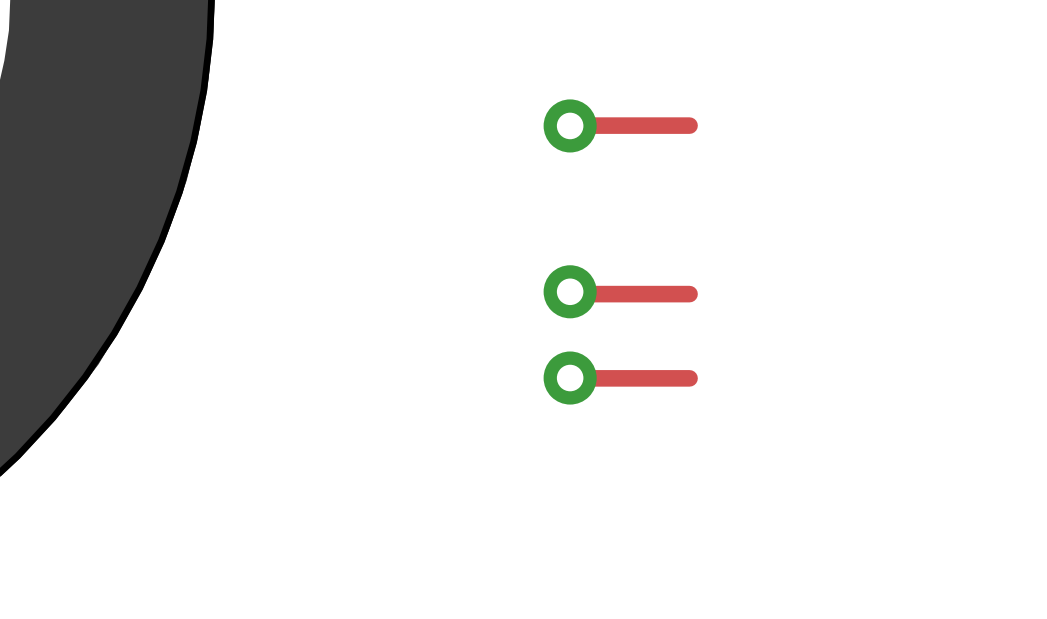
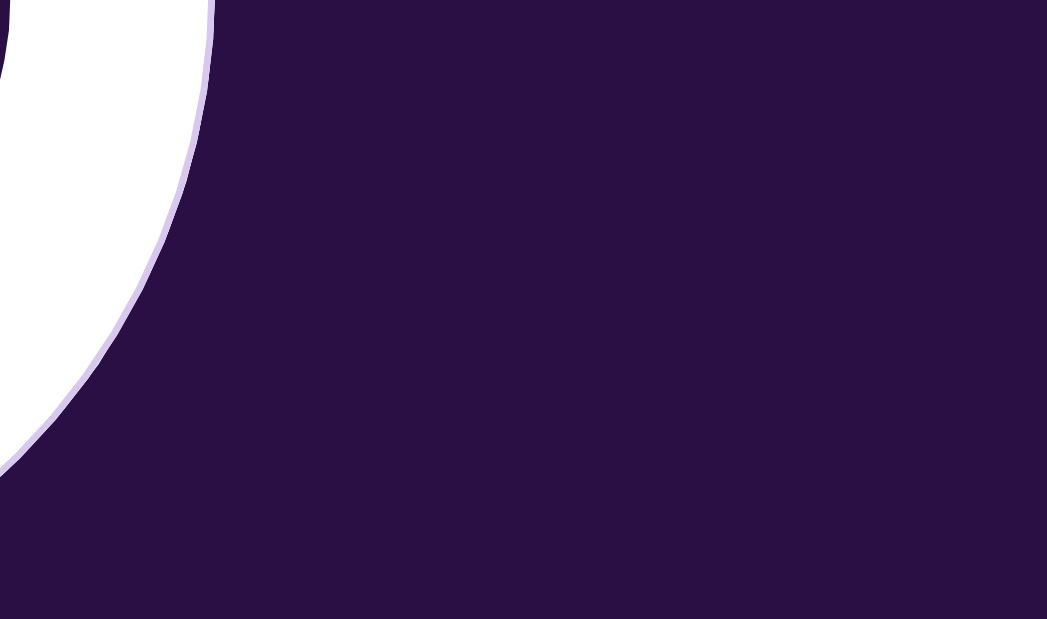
track: (570, 125) (689, 125) -> none
via: (570, 125) -> none
track: (570, 291) (572, 294) (689, 294) -> none
via: (570, 291) -> none
track: (570, 378) (689, 378) -> none
via: (570, 378) -> none

